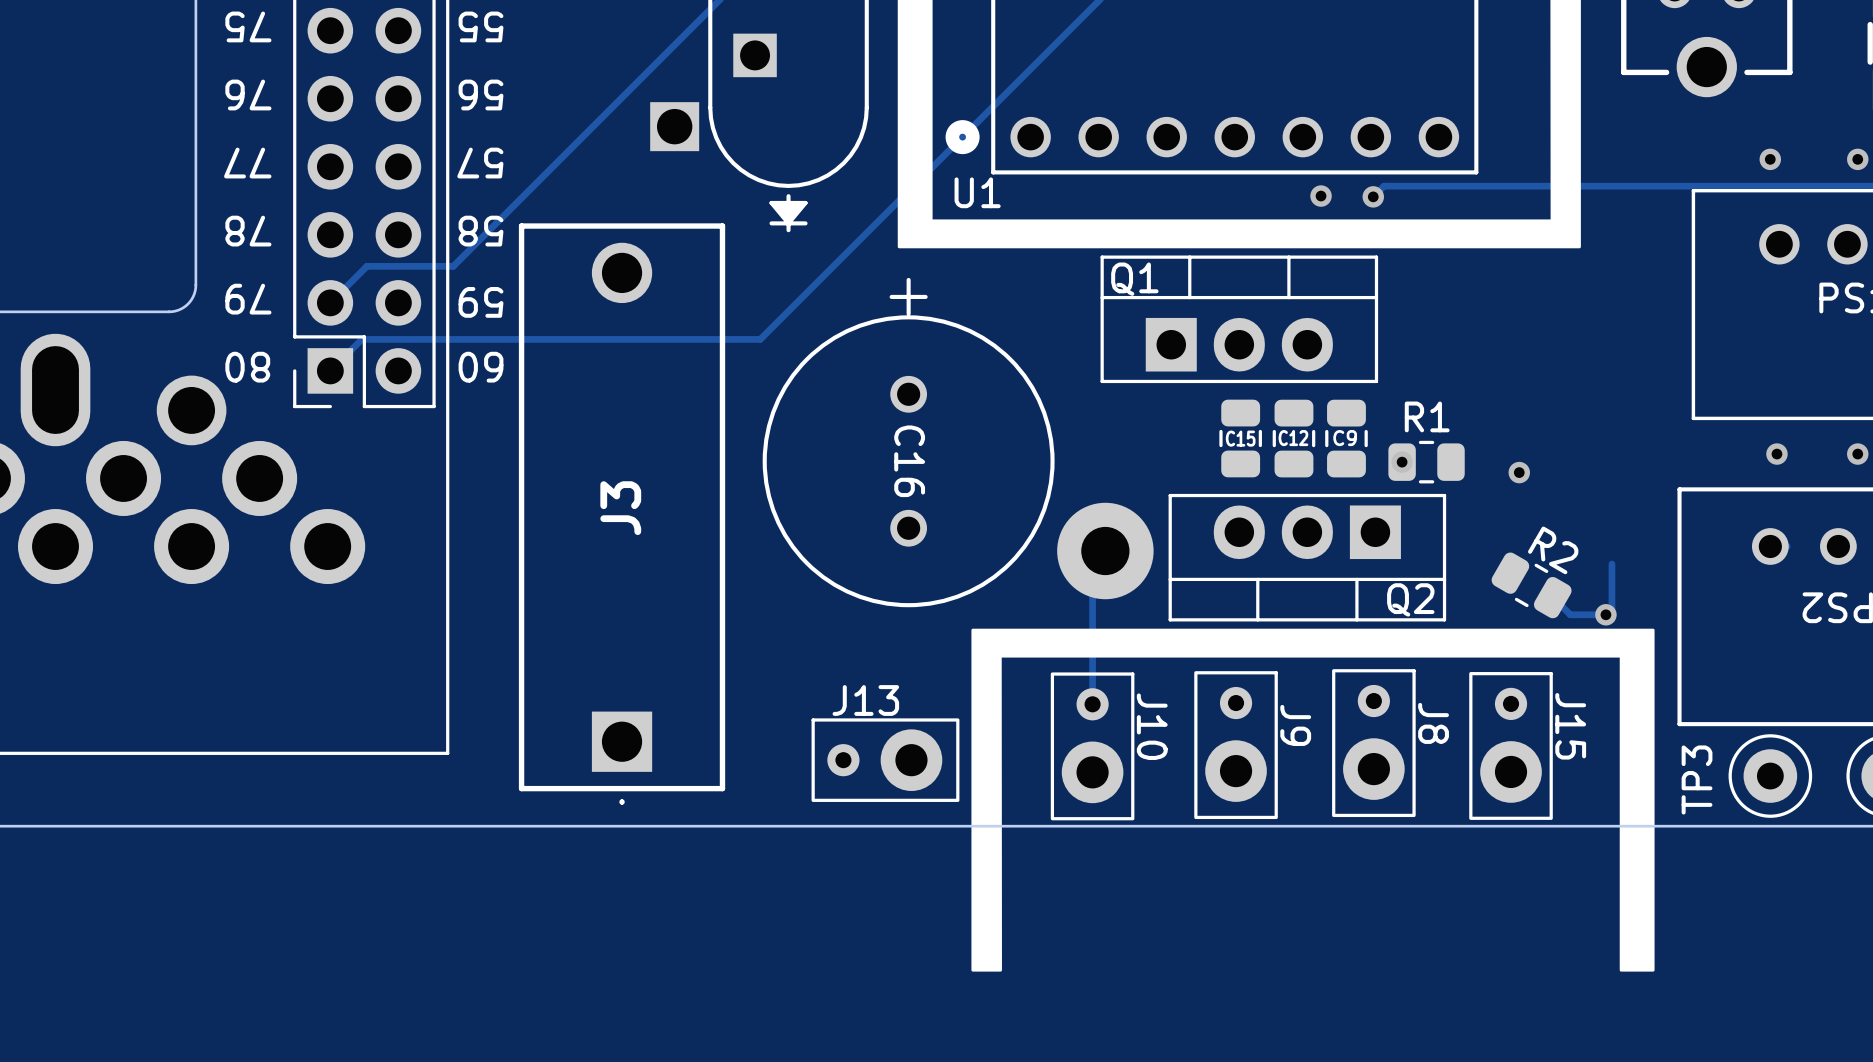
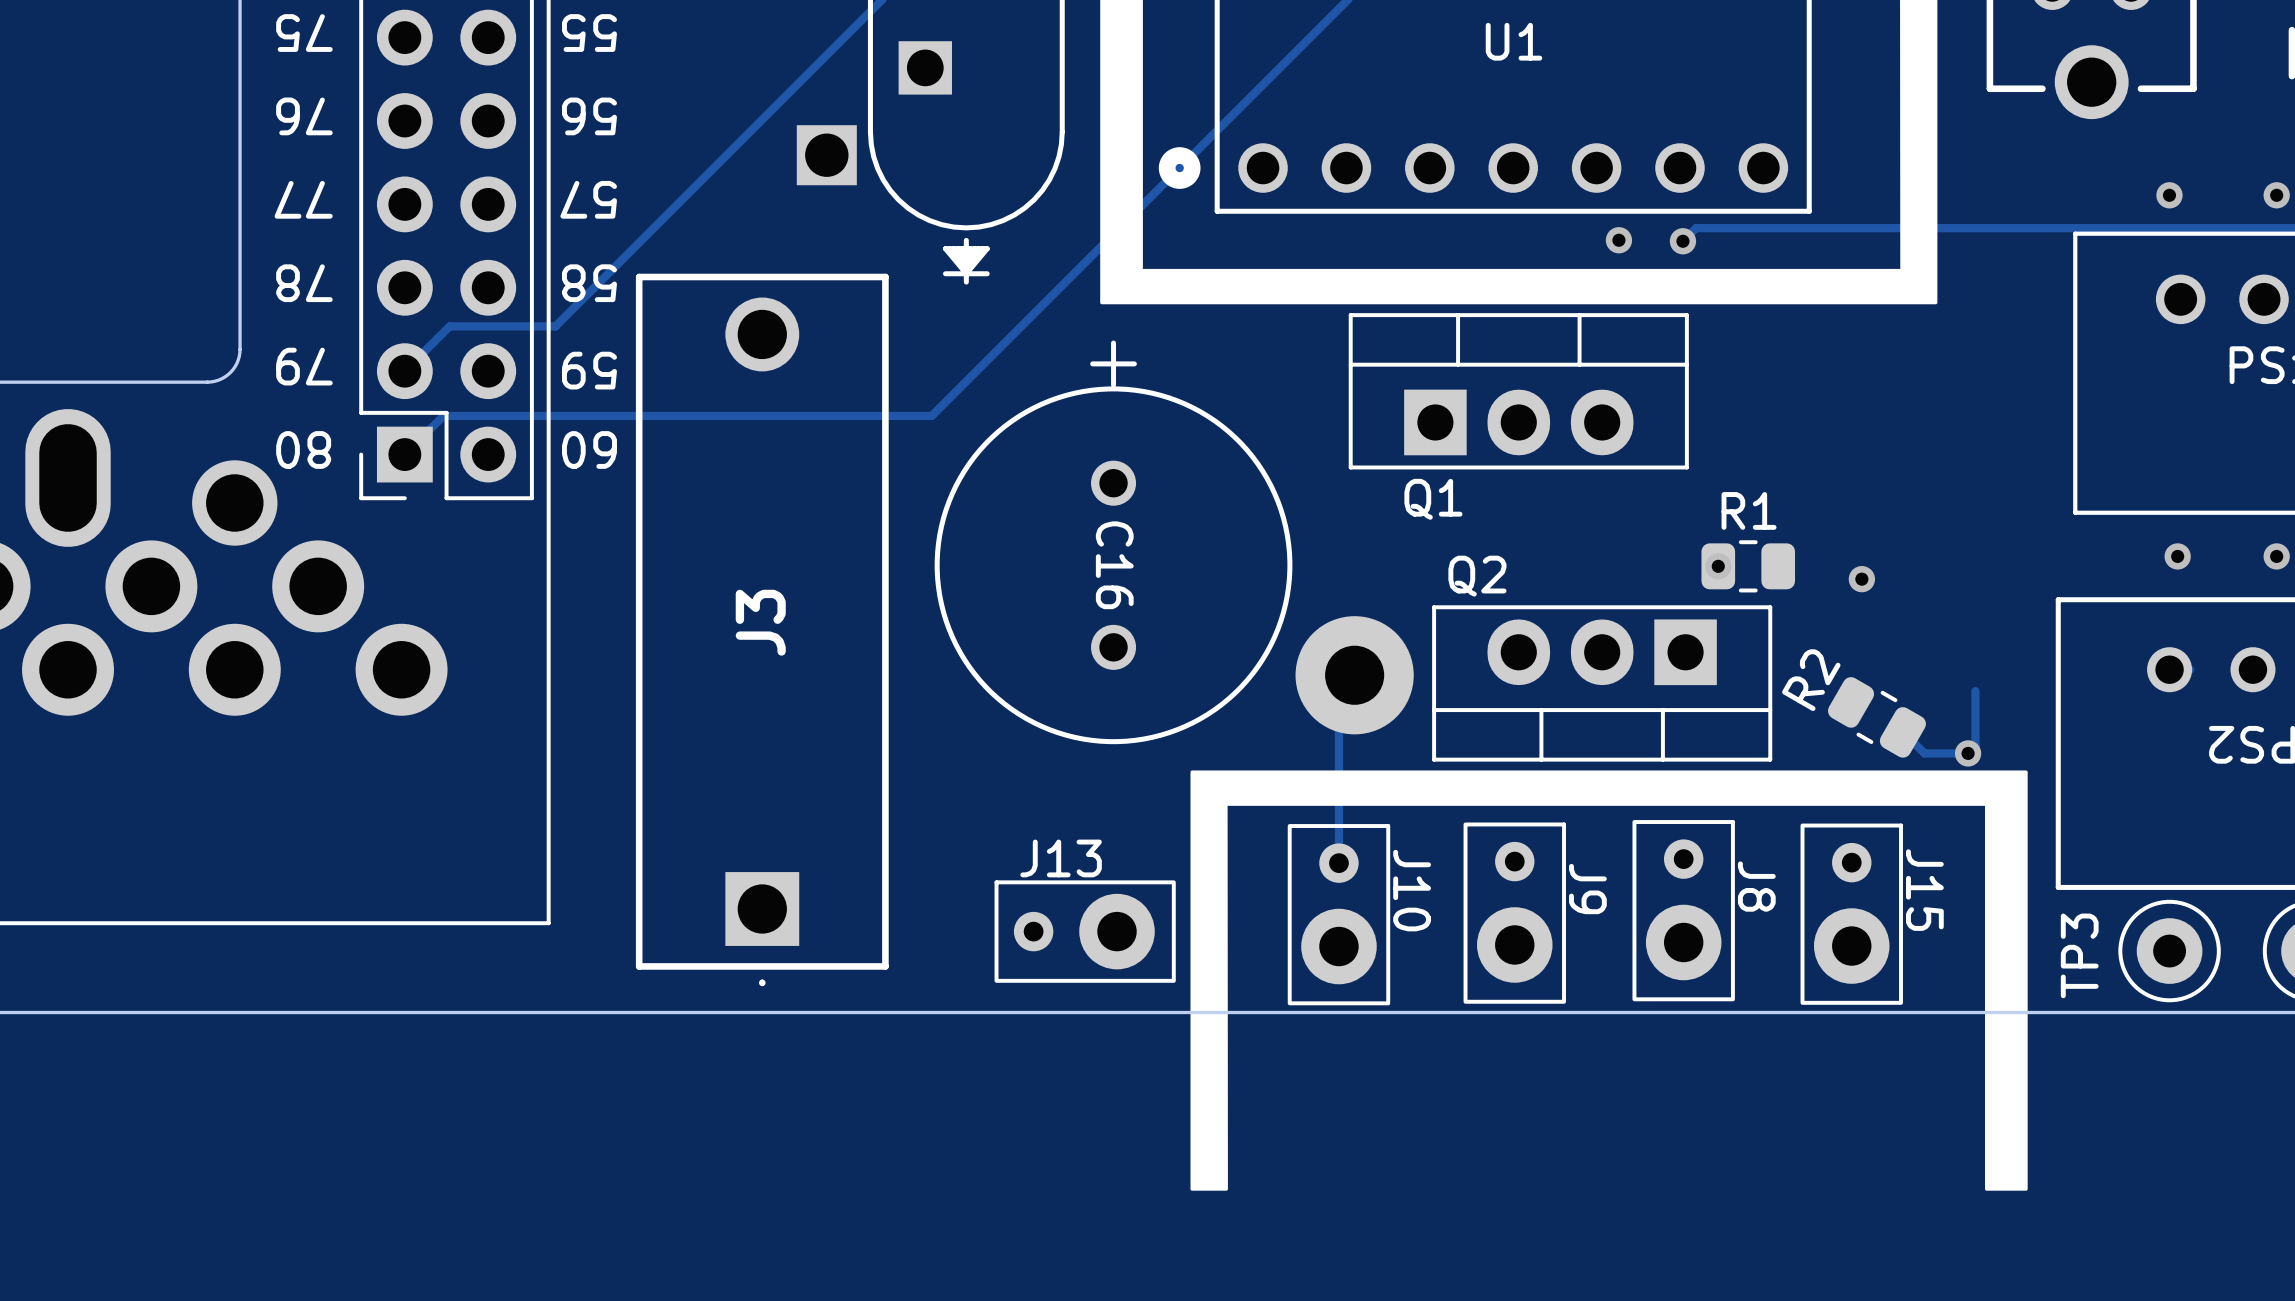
U1 name position: U1 (977, 192) -> U1 (1513, 41)
Q1 name position: Q1 (1134, 279) -> Q1 (1433, 499)
C15: (1240, 438) -> none
C12: (1293, 438) -> none
C9: (1346, 438) -> none
R2 name rotation: 0° (1553, 550) -> 90° counterclockwise (1811, 680)
Q2 name position: Q2 (1410, 599) -> Q2 (1477, 576)

